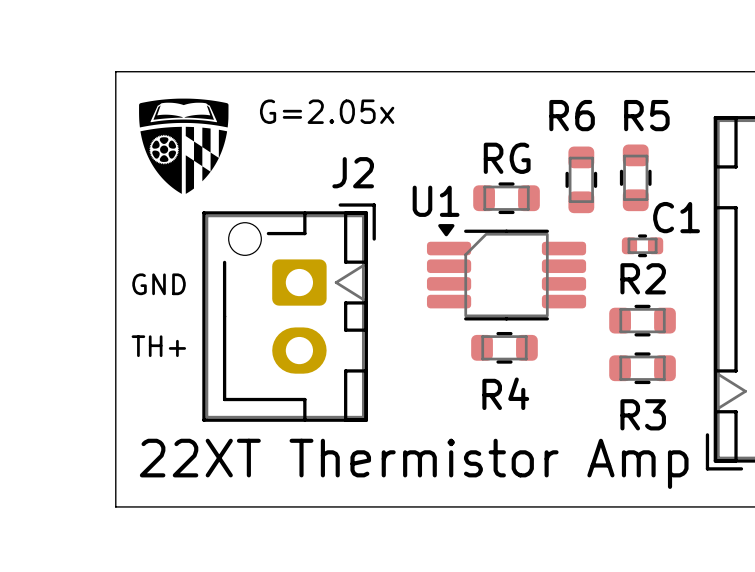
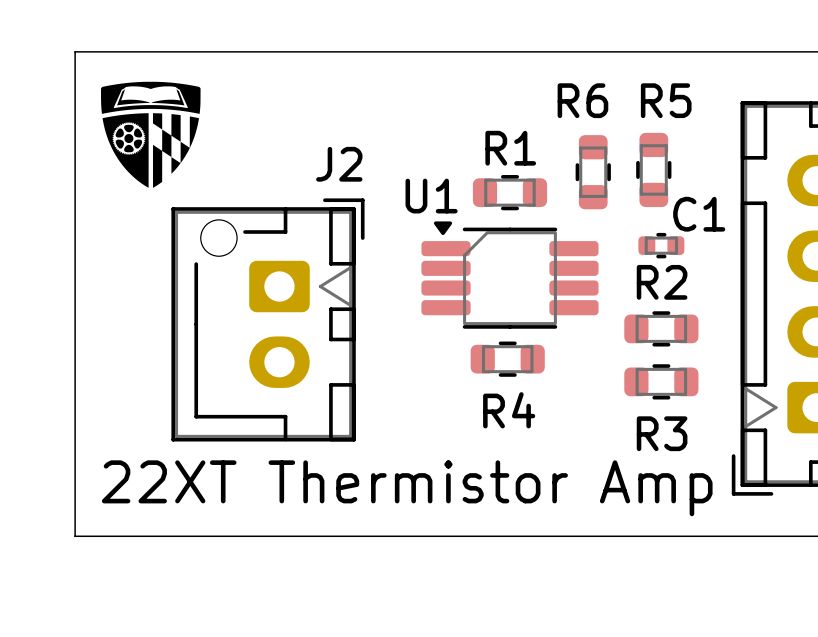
text: G=2.05x (327, 111) -> none
RG name: RG (507, 158) -> R1 (510, 148)
text: GND (159, 284) -> none
text: TH+ (158, 346) -> none

